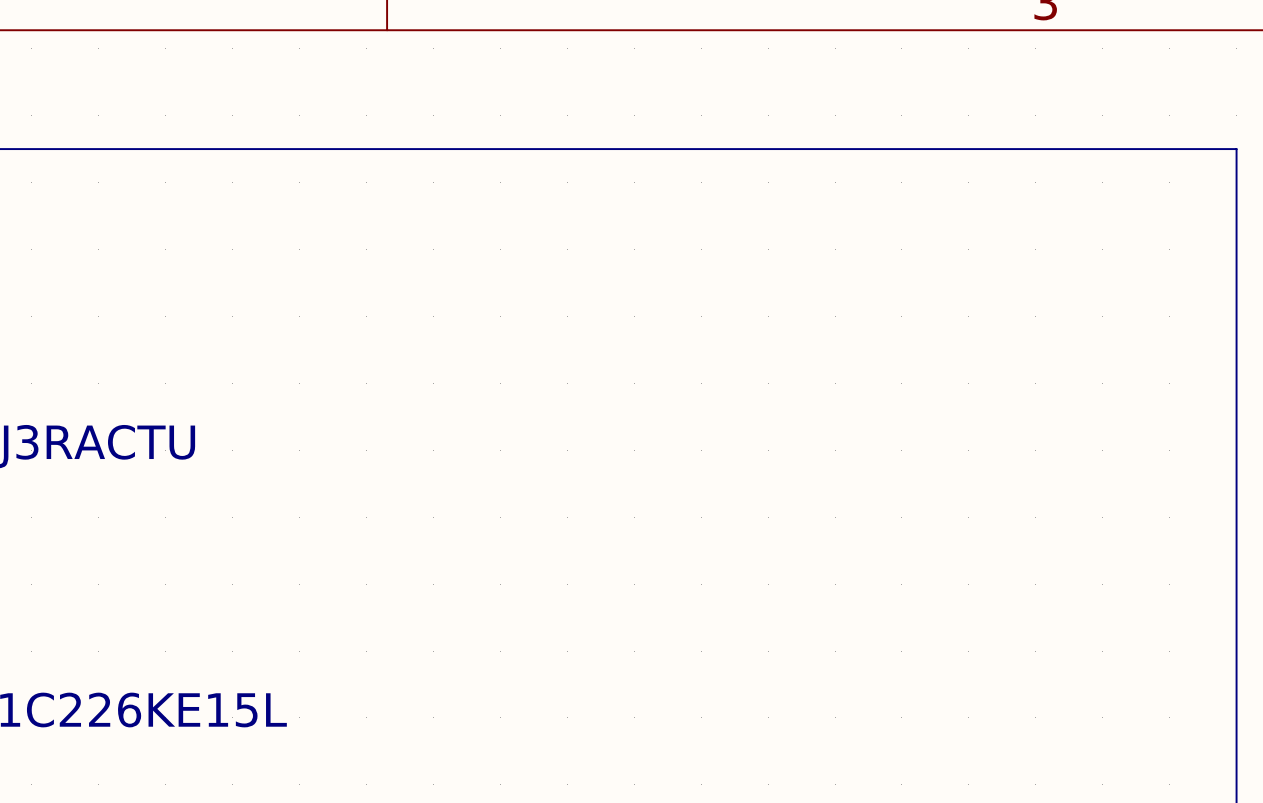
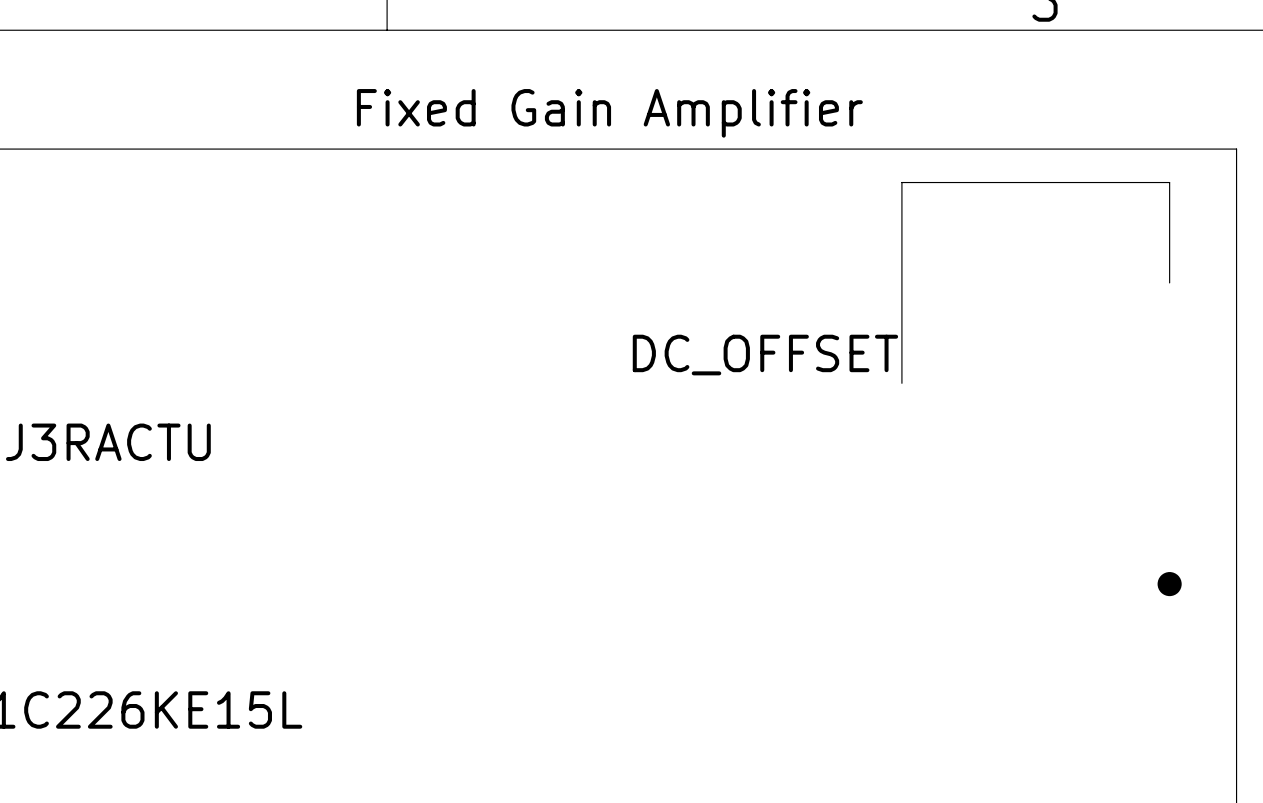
text: none -> Fixed Gain Amplifier (609, 113)
wire: none -> (1169, 282) (1169, 182) (901, 182) (901, 383)
label: none -> DC_OFFSET (765, 355)
junction: none -> (1169, 584)

